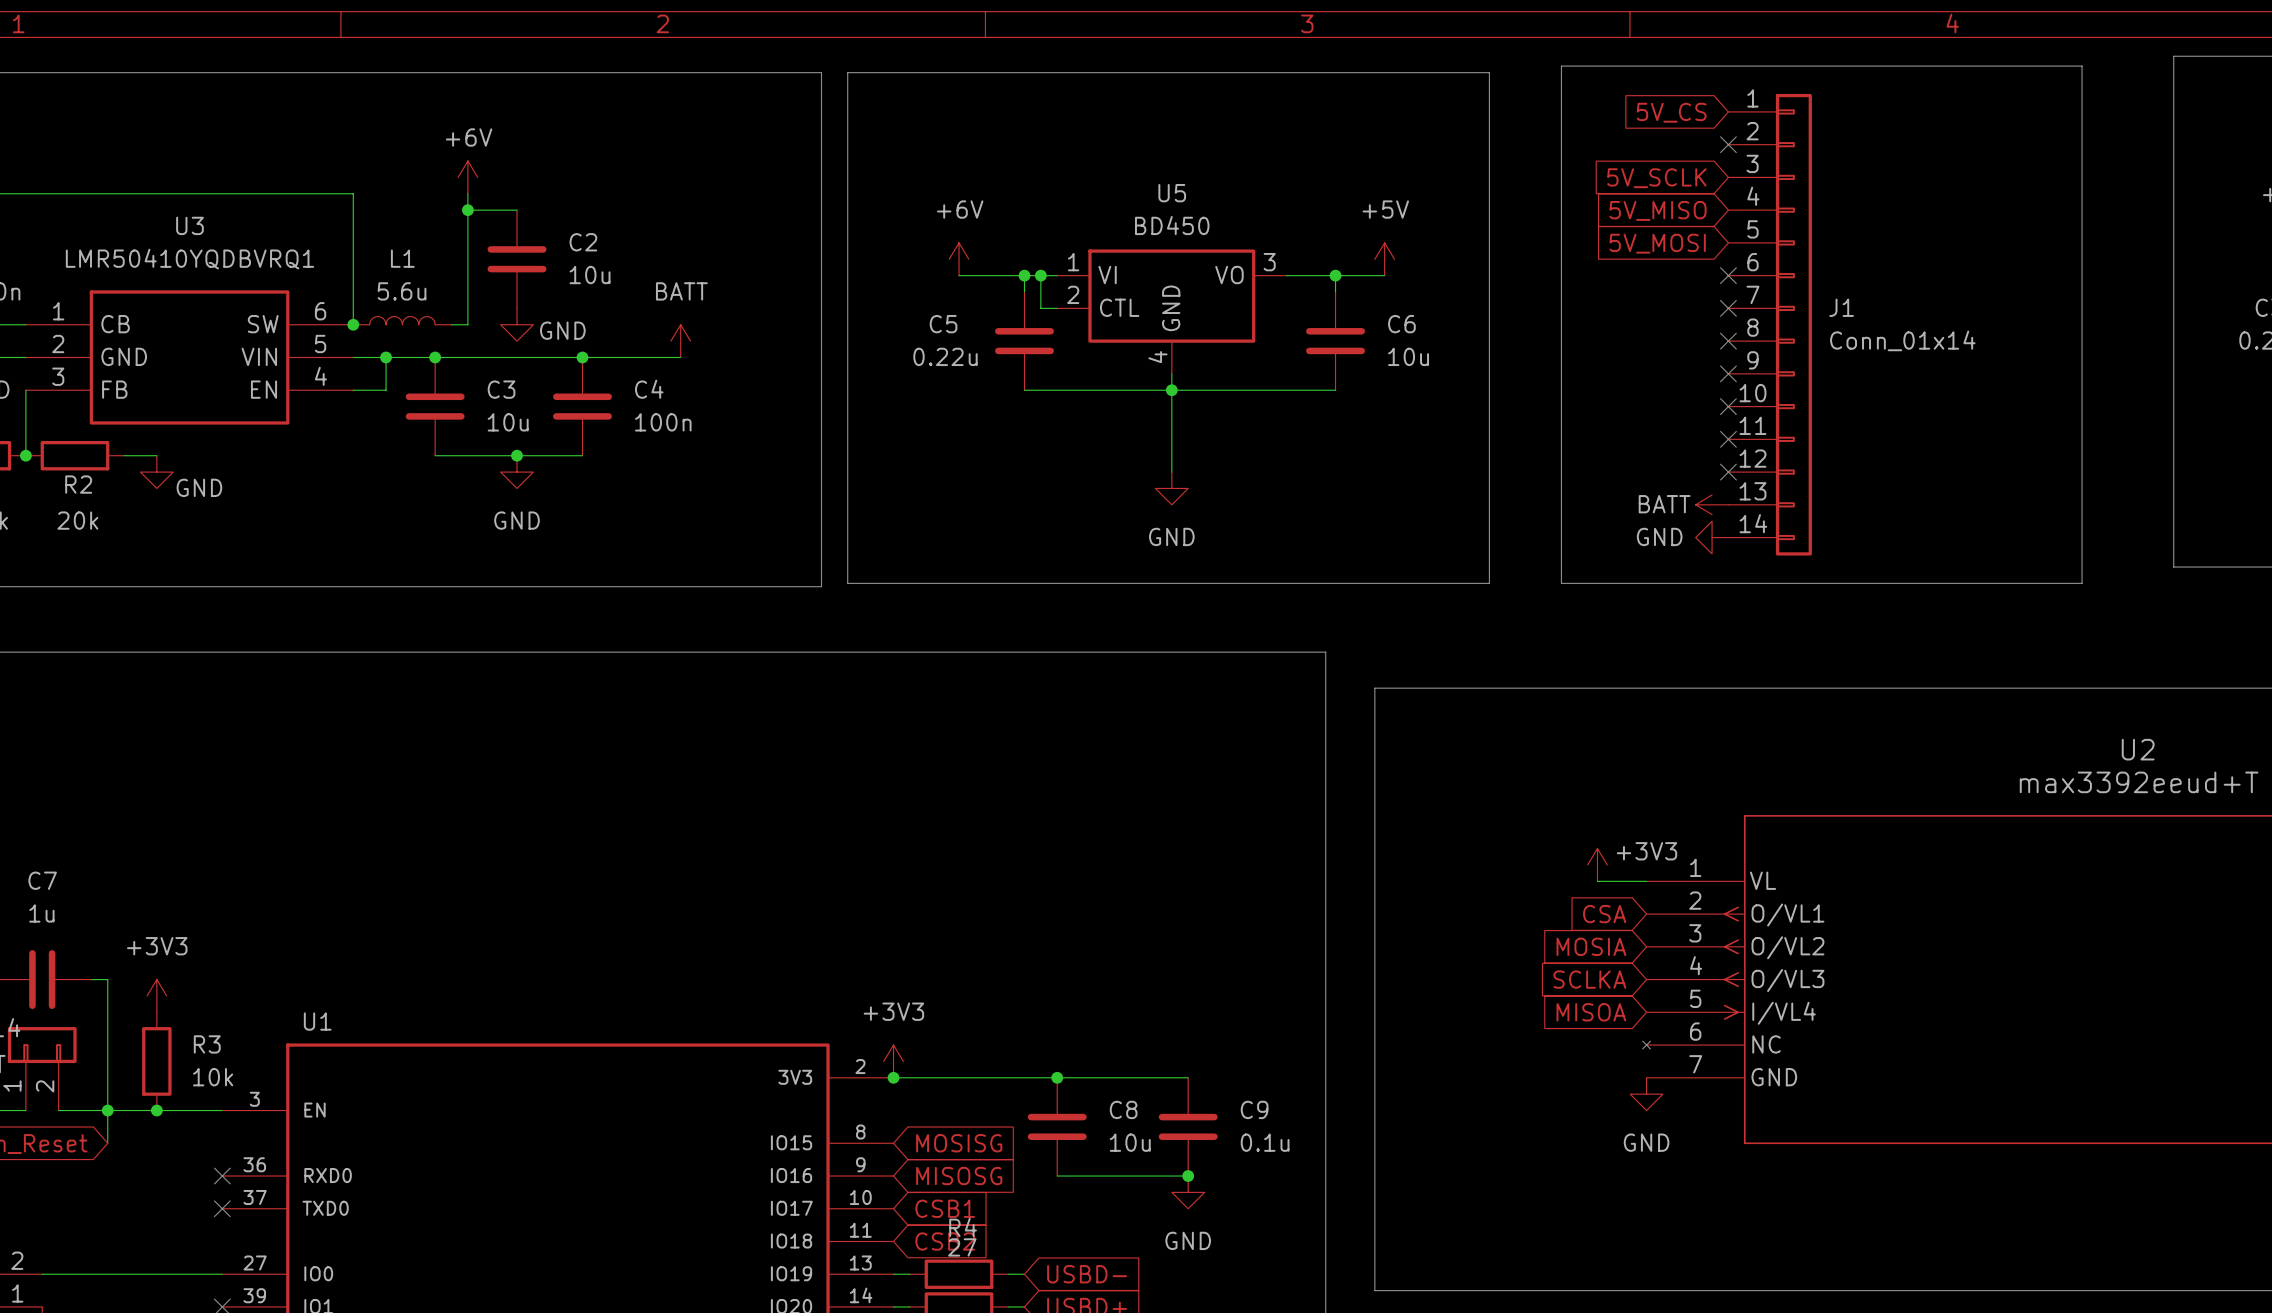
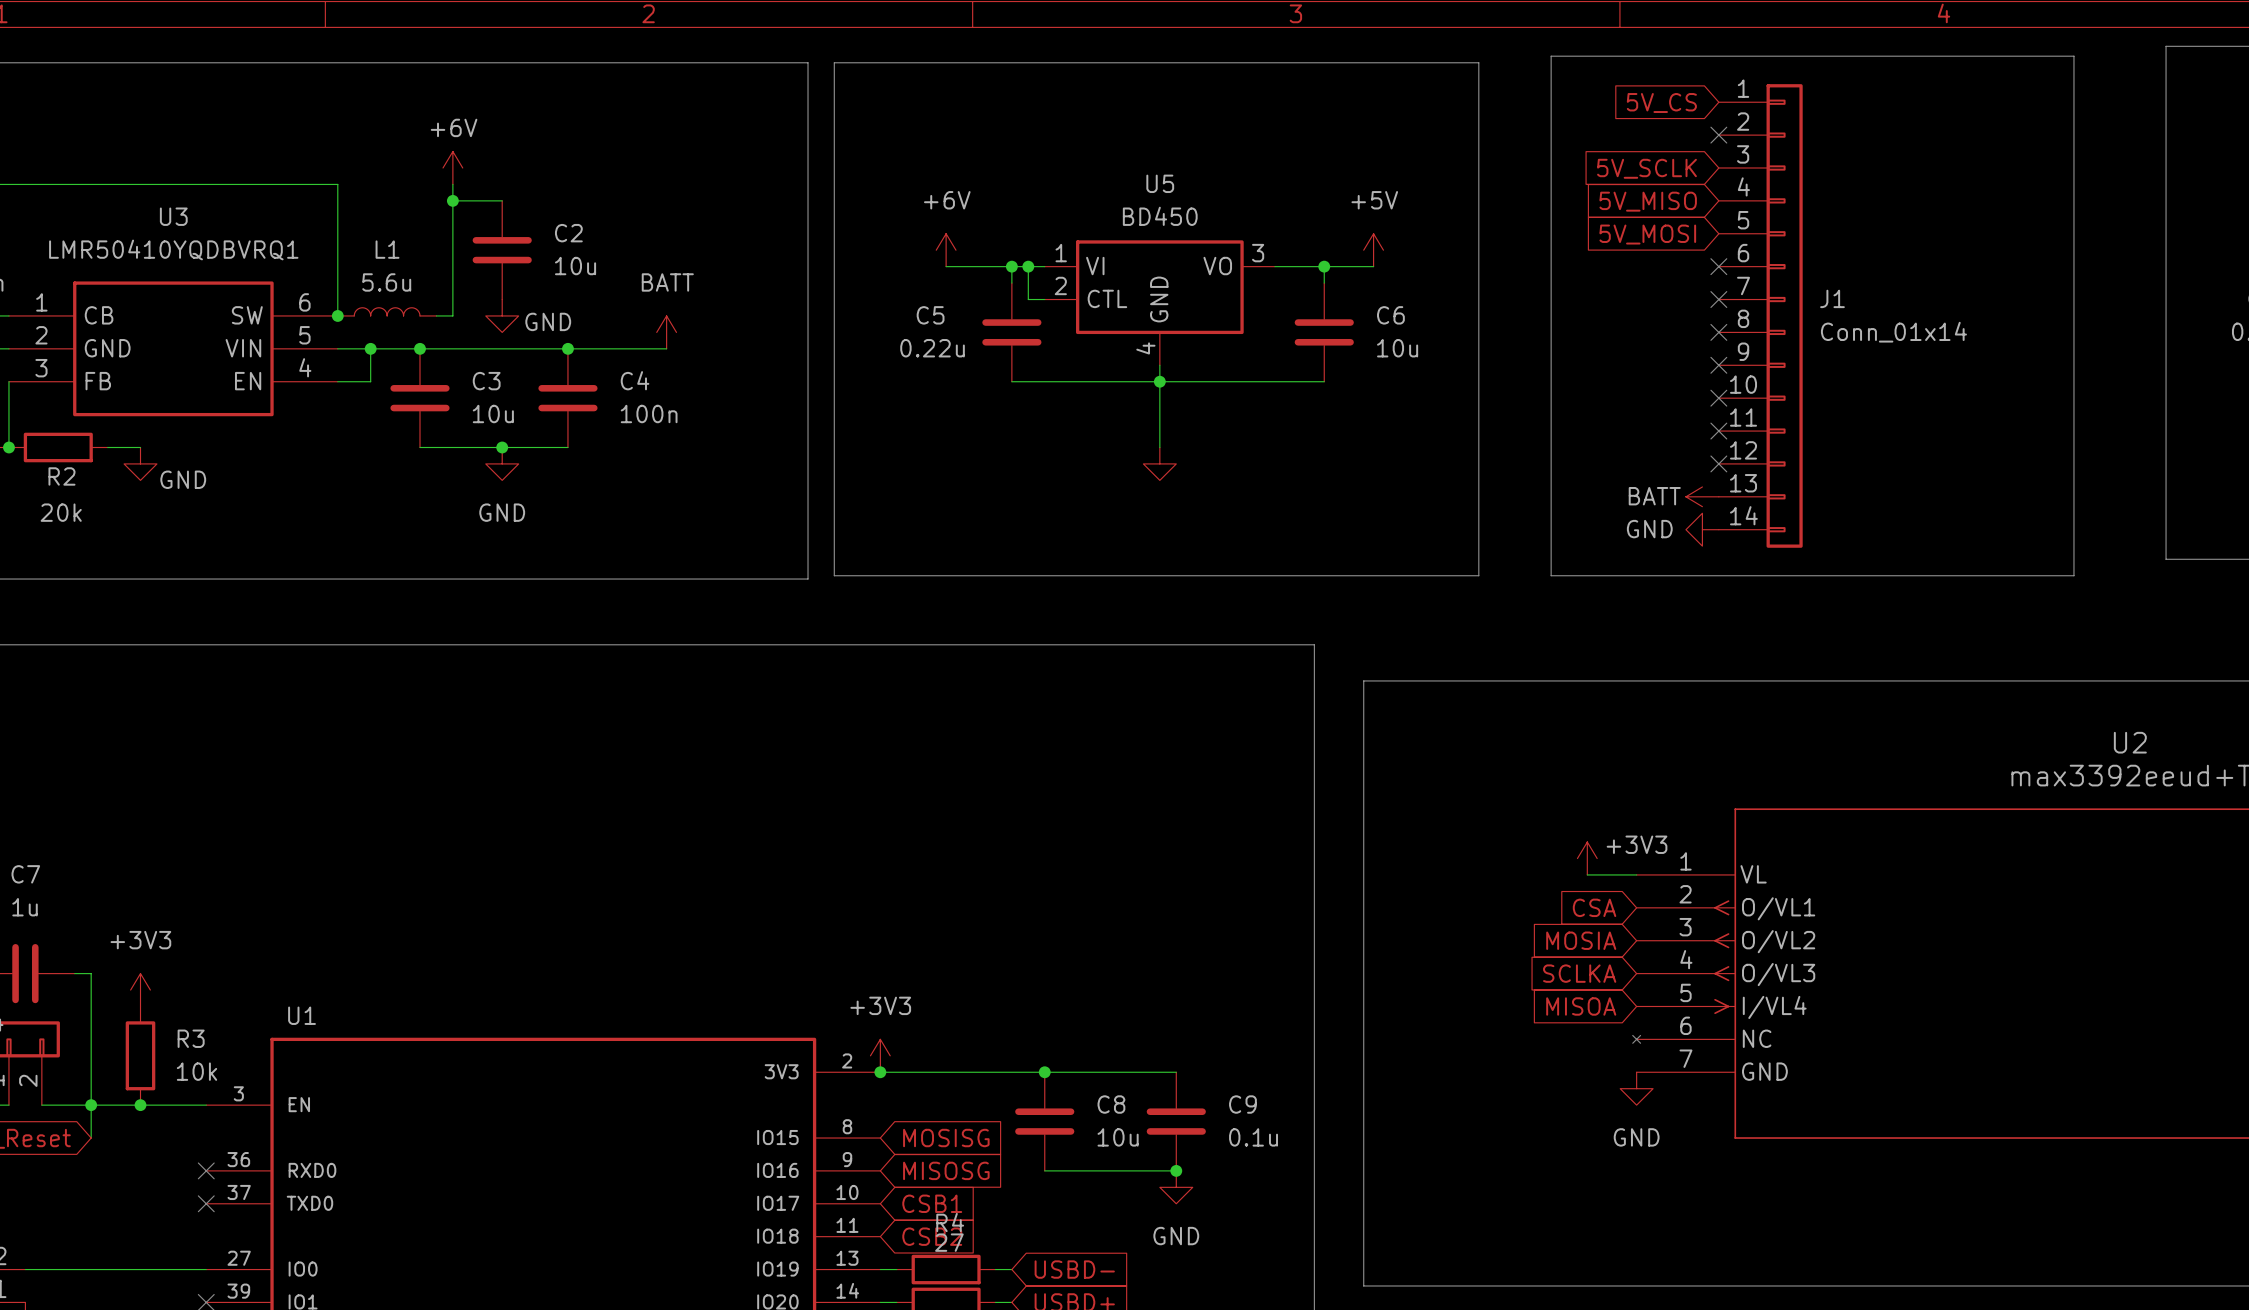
power symbol: none -> (1159, 463)
power symbol: GND (1171, 488) -> none

